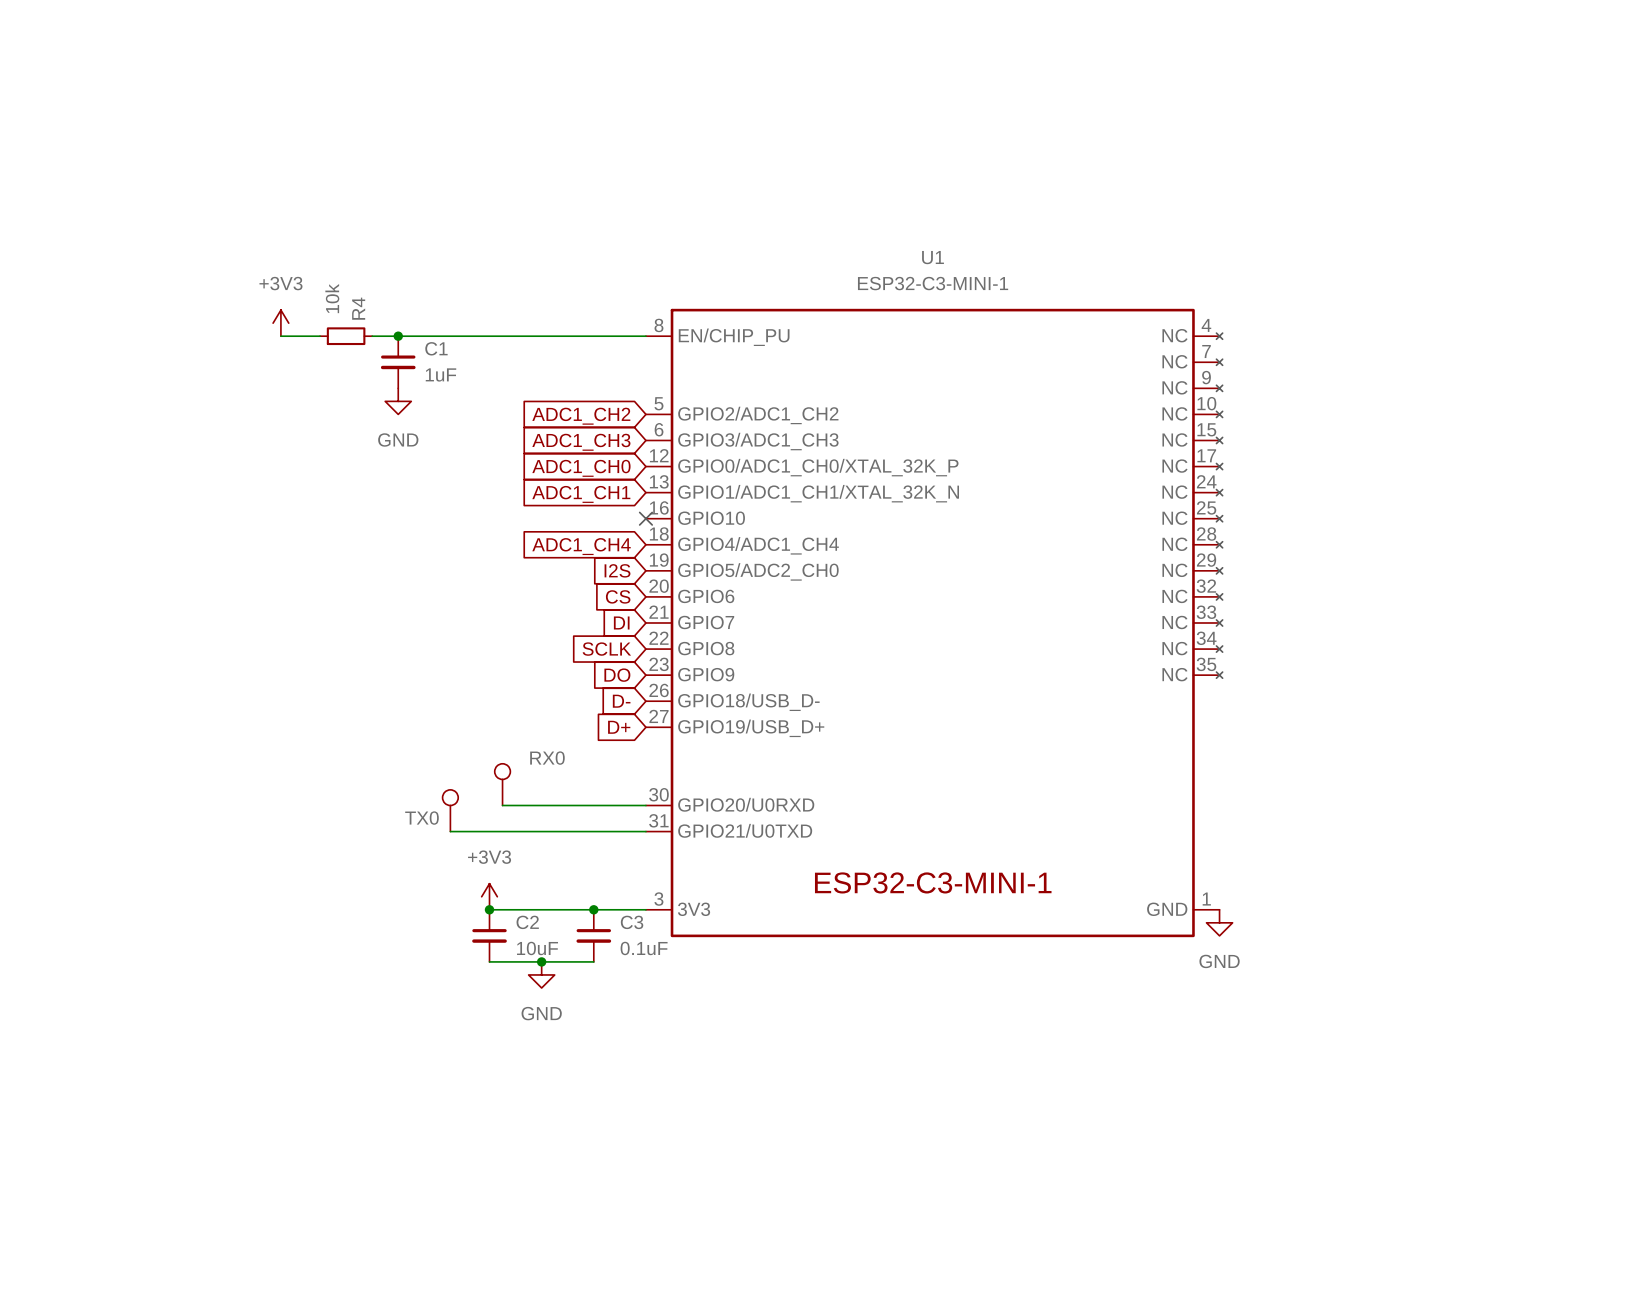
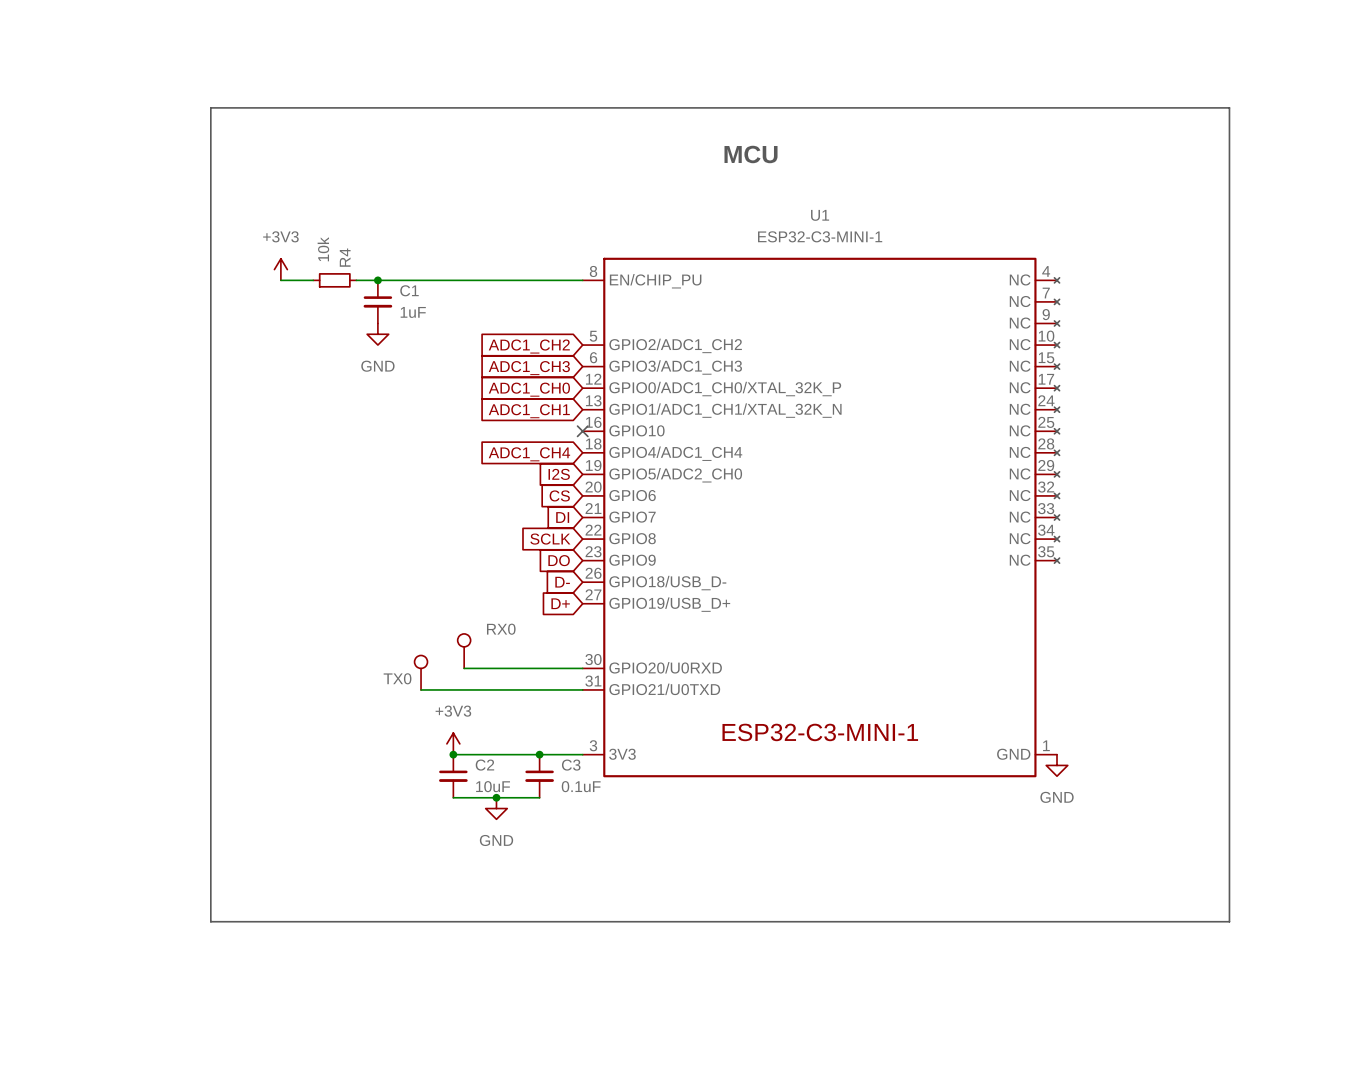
line: none -> (210, 107) (1229, 107) (1229, 921) (210, 921) (210, 107)
text: none -> MCU (751, 154)

